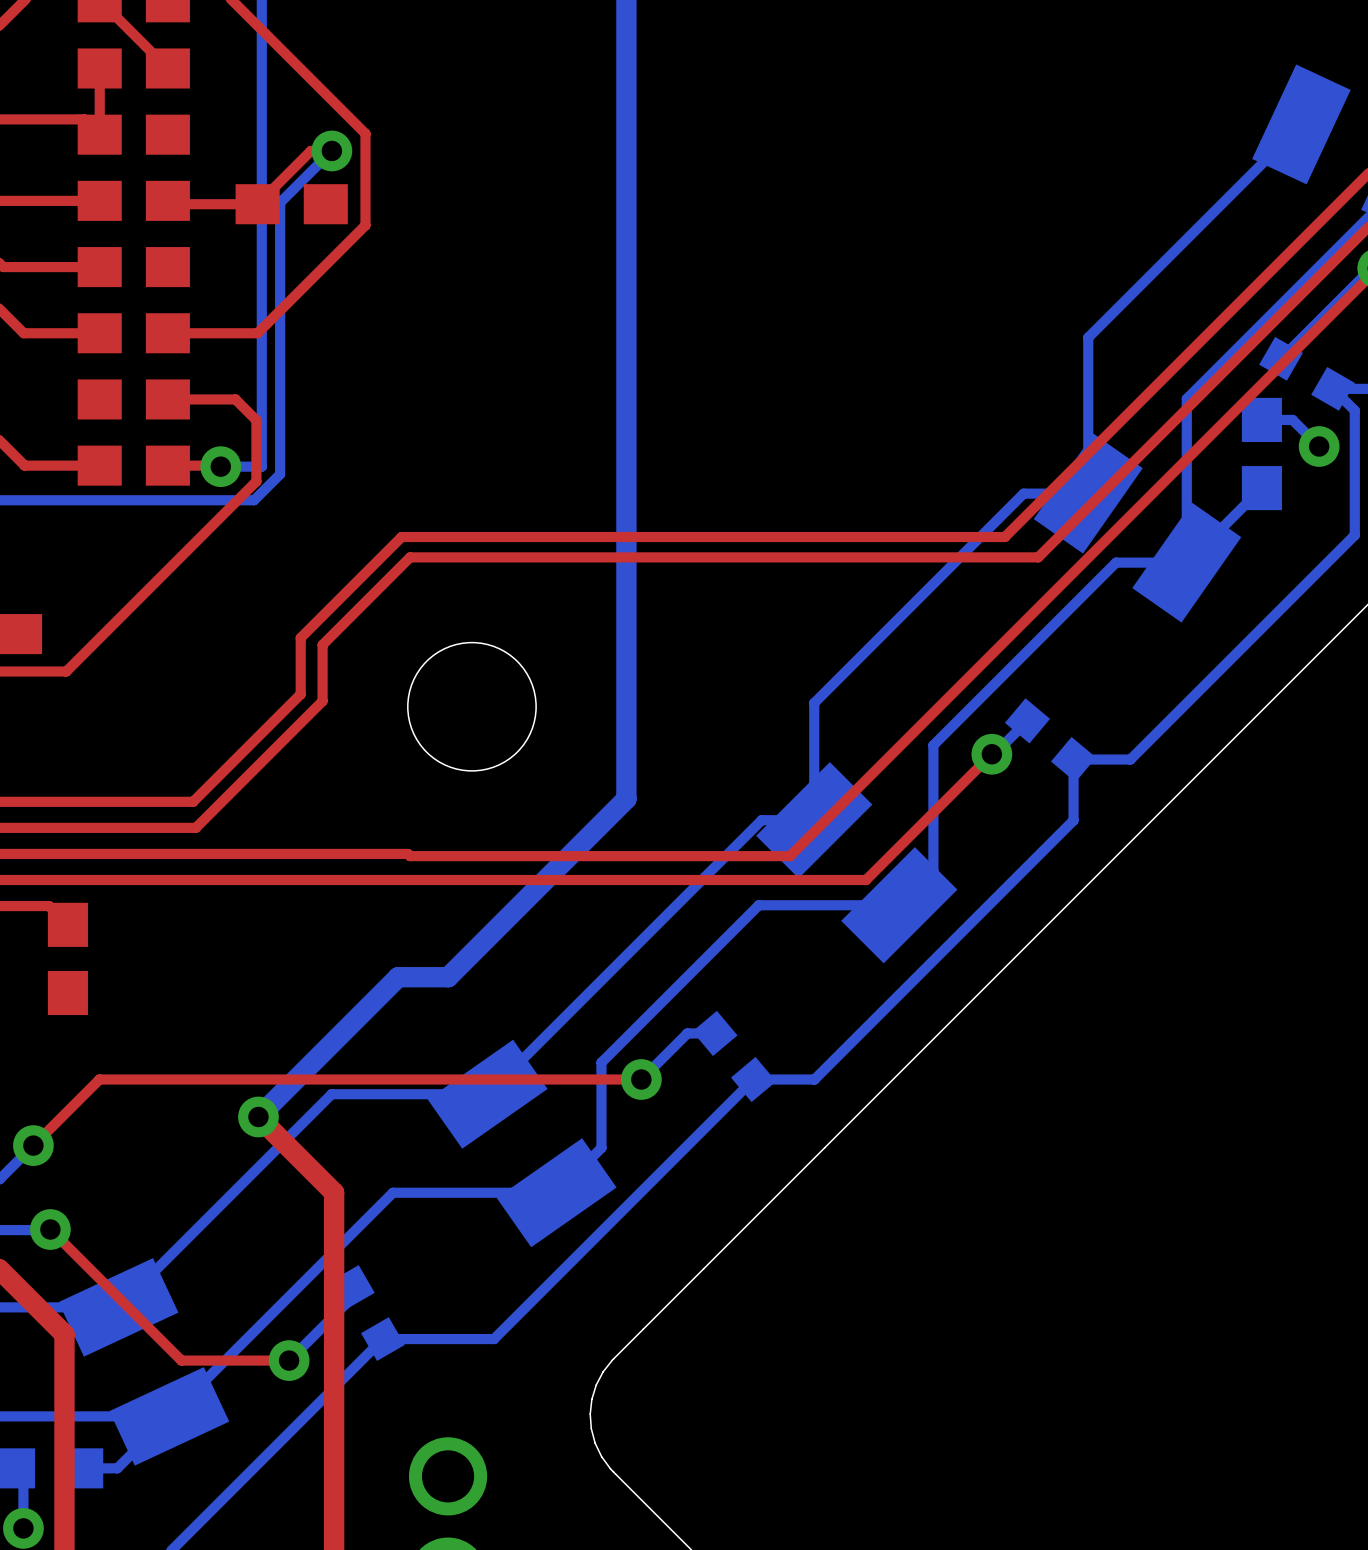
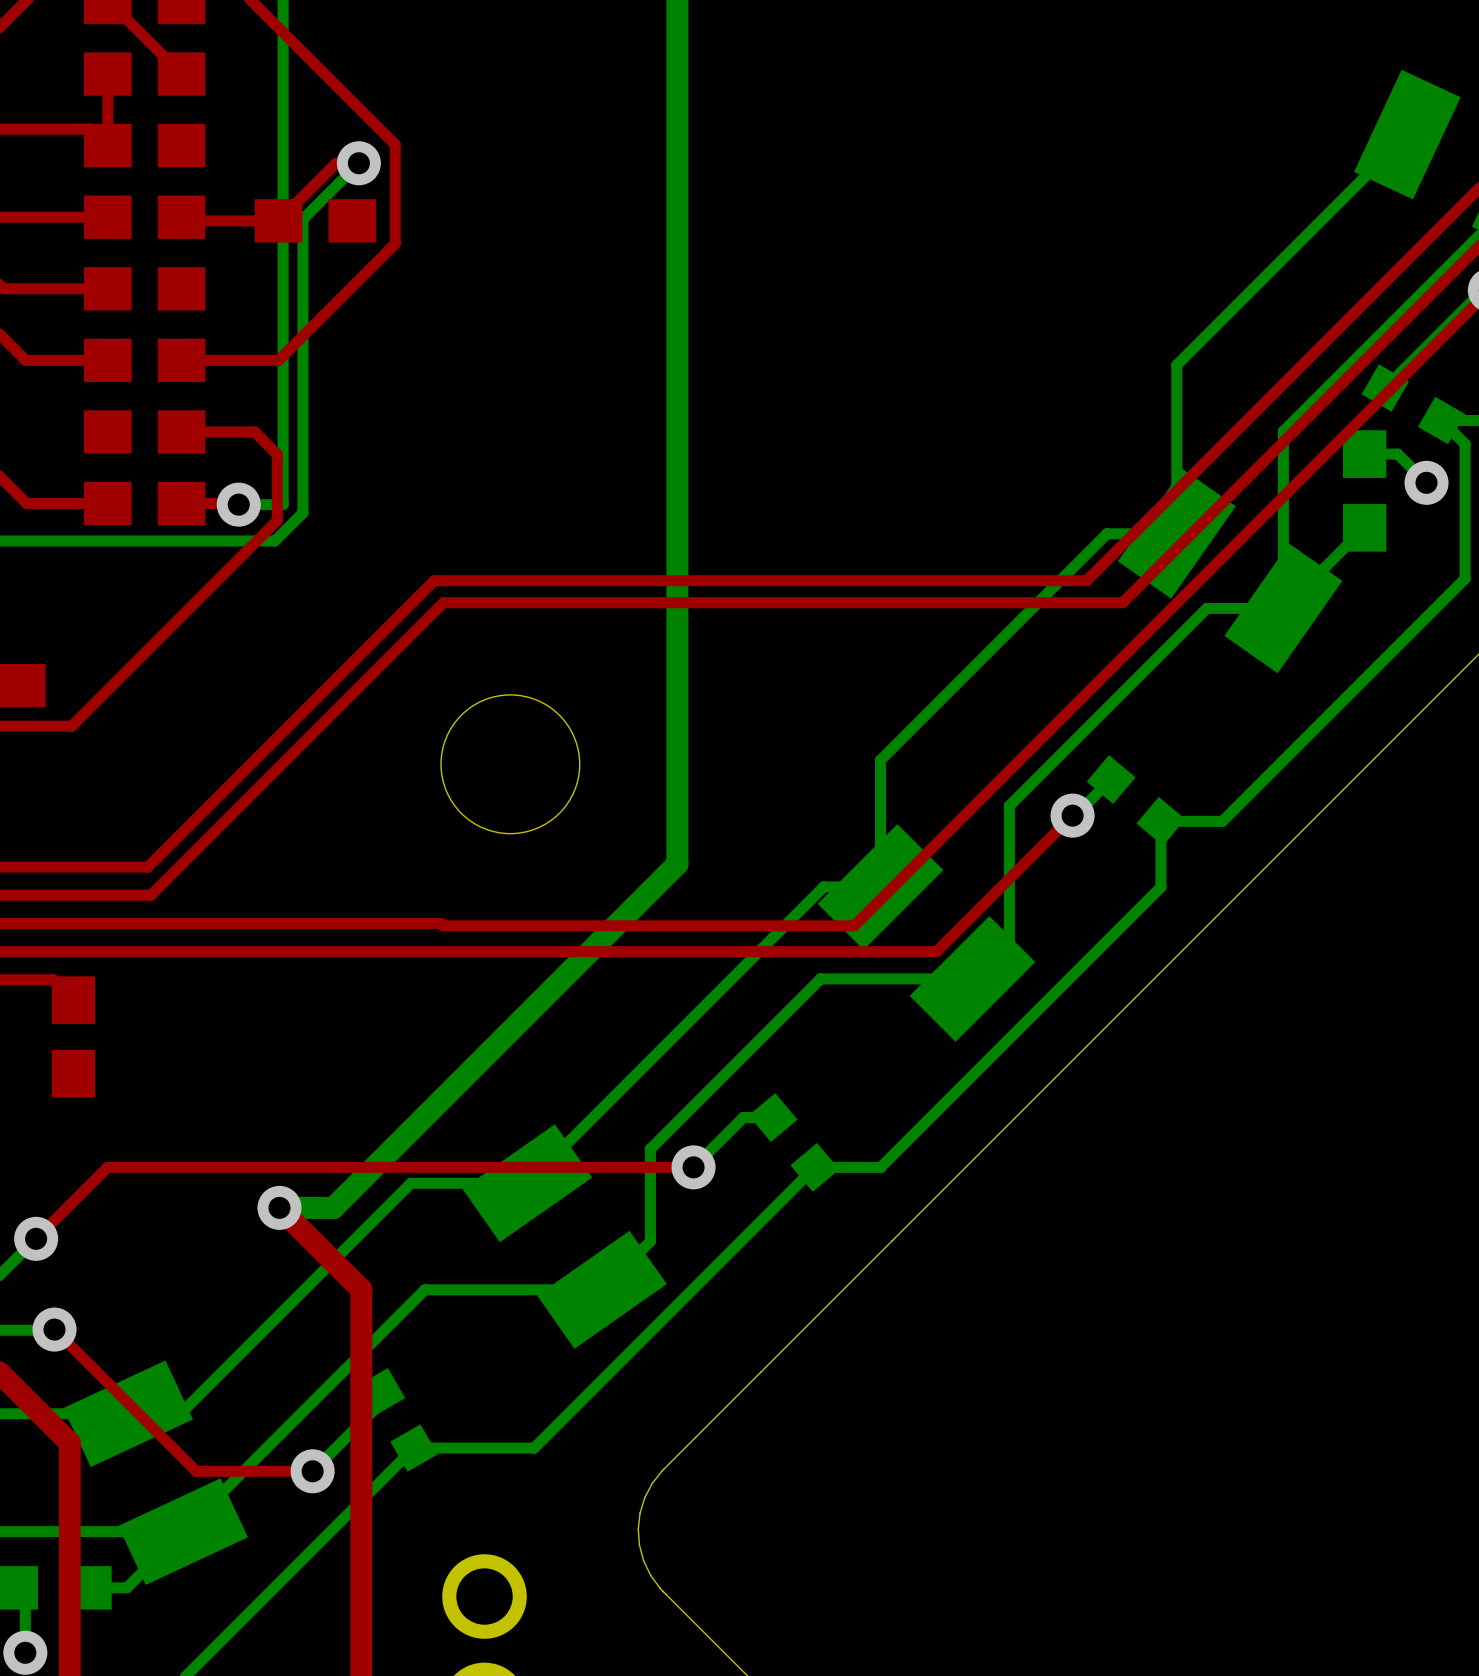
top track: (300, 637) (300, 694) (193, 801) (136, 801) -> (325, 689) (147, 867)
top track: (322, 644) (322, 701) (195, 827) (139, 827) -> (348, 697) (150, 895)
bottom track: (448, 977) (398, 977) (258, 1116) -> (484, 1056) (333, 1207) (279, 1207)
bottom track: (380, 1094) (331, 1094) (118, 1307) -> (410, 1183) (180, 1413) (128, 1413)

